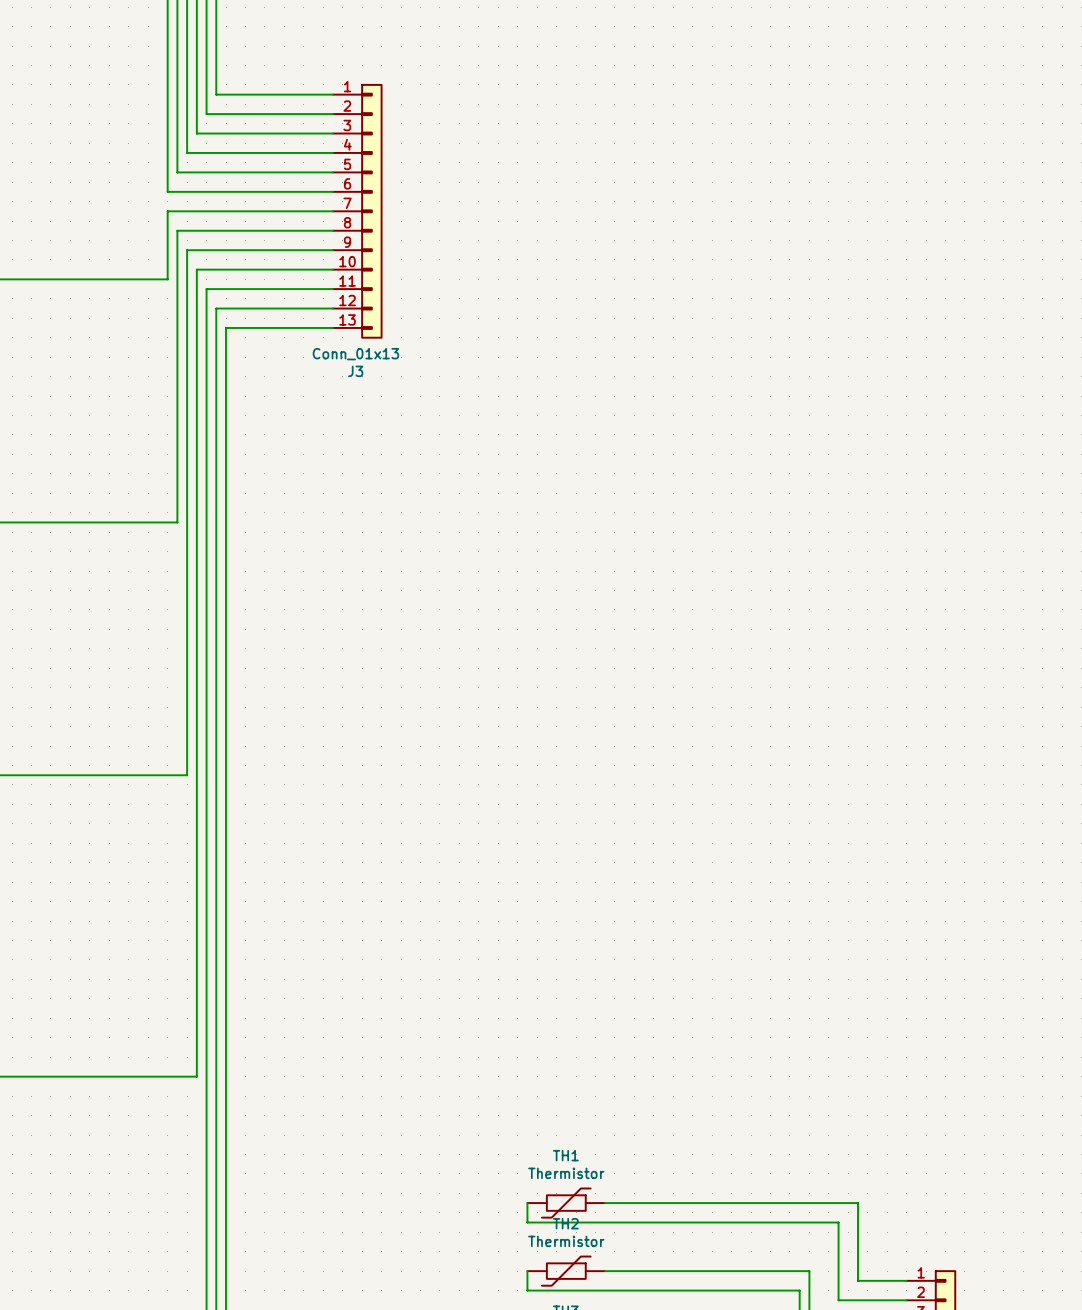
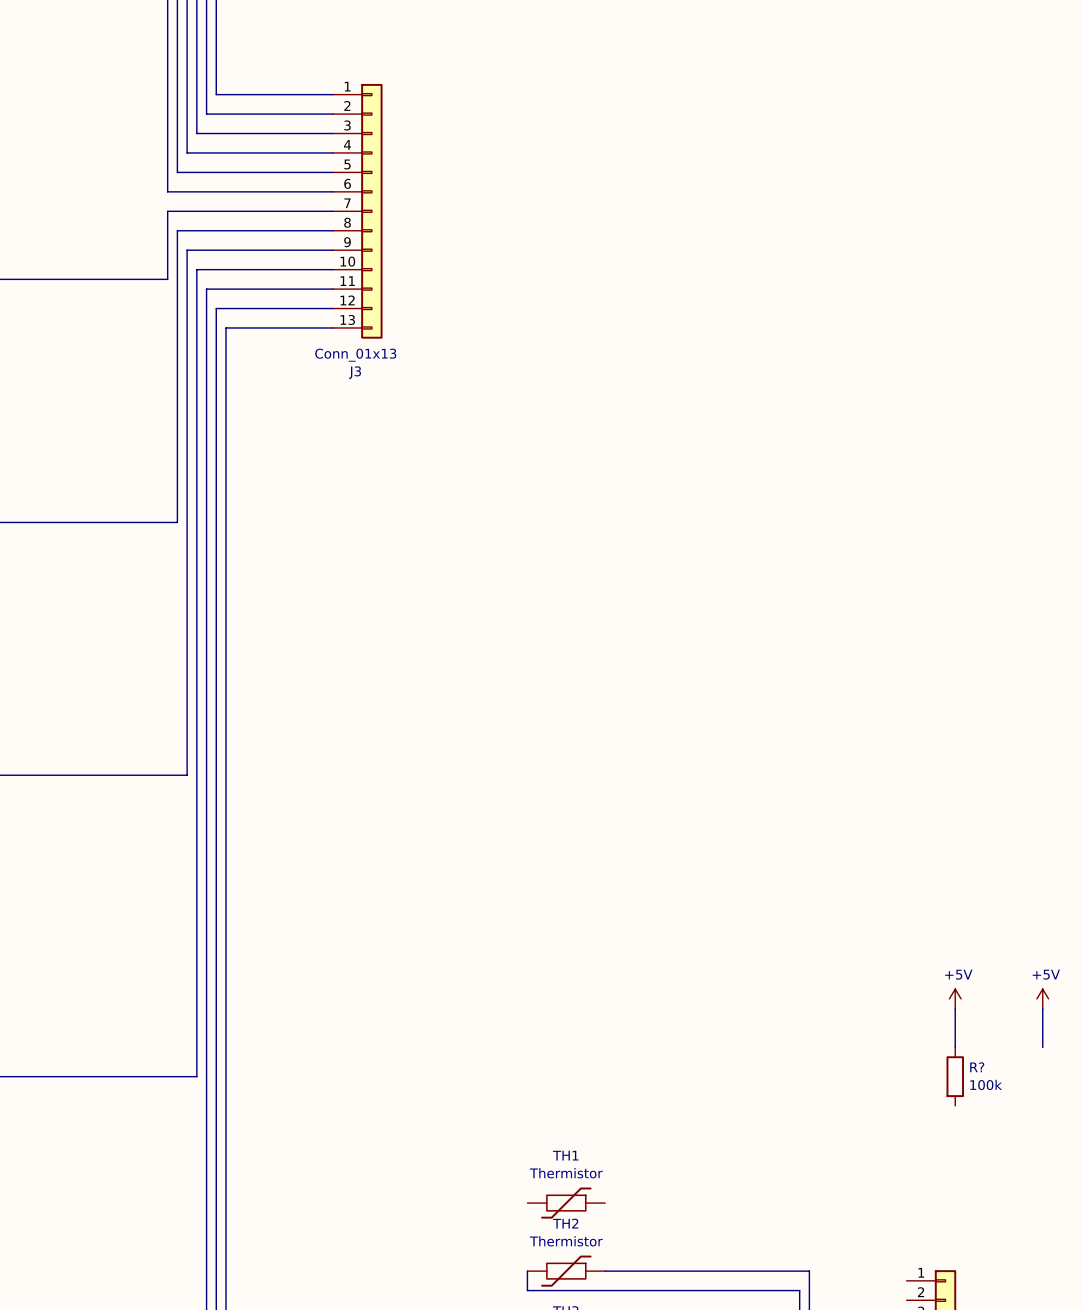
power symbol: none -> +5V (955, 998)
power symbol: none -> +5V (1042, 998)
wire: none -> (955, 1008) (955, 1047)
wire: none -> (1042, 1008) (1042, 1047)
R?: none -> 100k (955, 1076)
wire: (527, 1203) (527, 1222) (838, 1222) (838, 1300) (906, 1300) -> none
wire: (605, 1203) (858, 1203) (858, 1280) (906, 1280) -> none

